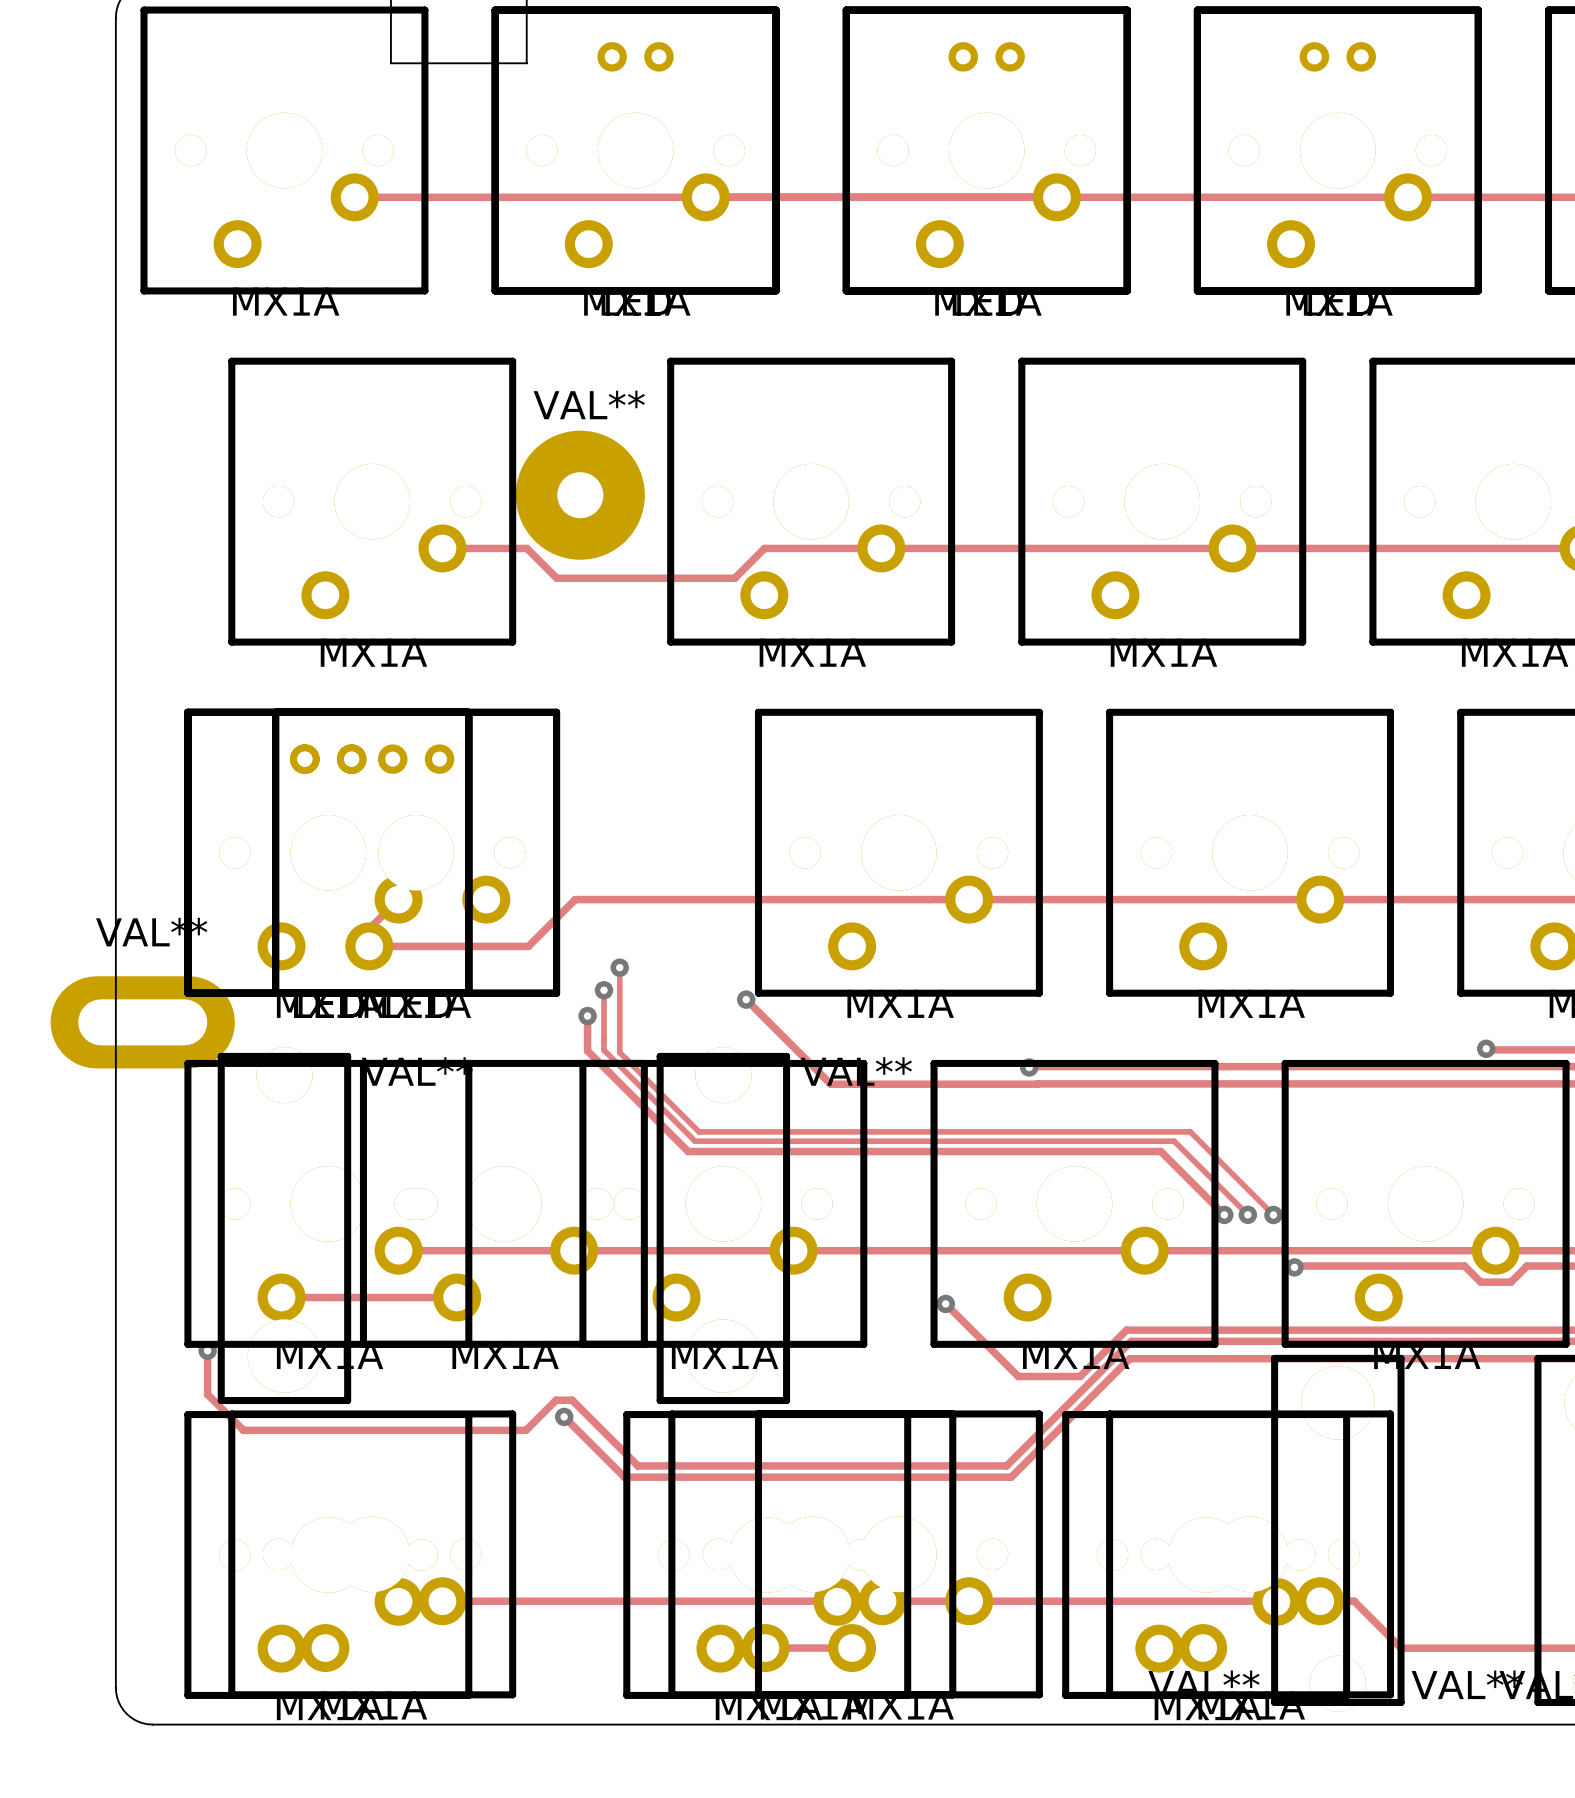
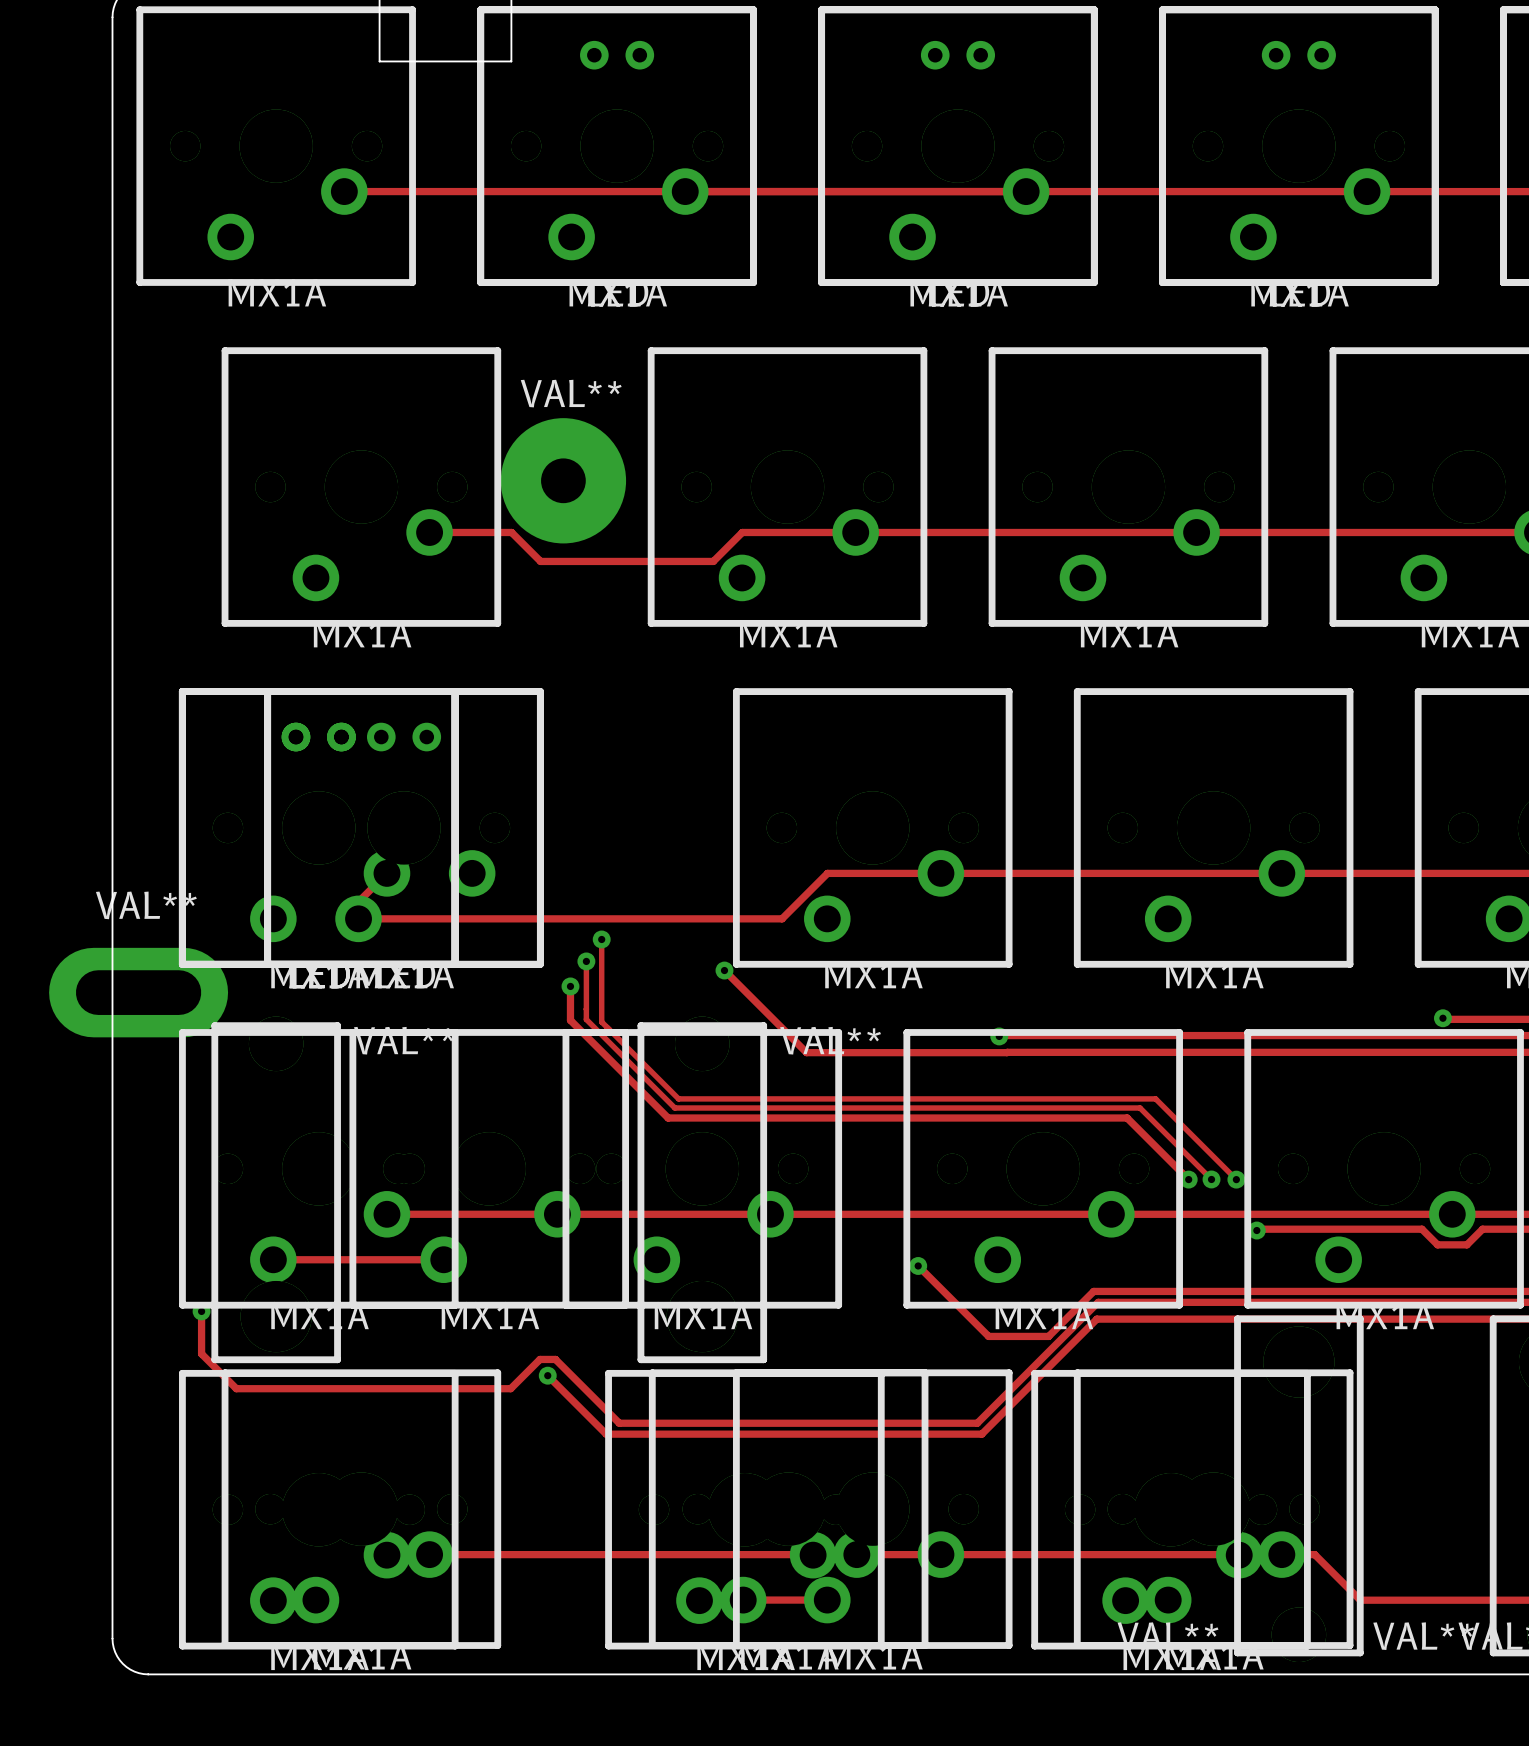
track: (852, 899) (575, 899) (528, 946) -> (827, 873) (782, 918) (513, 918)

